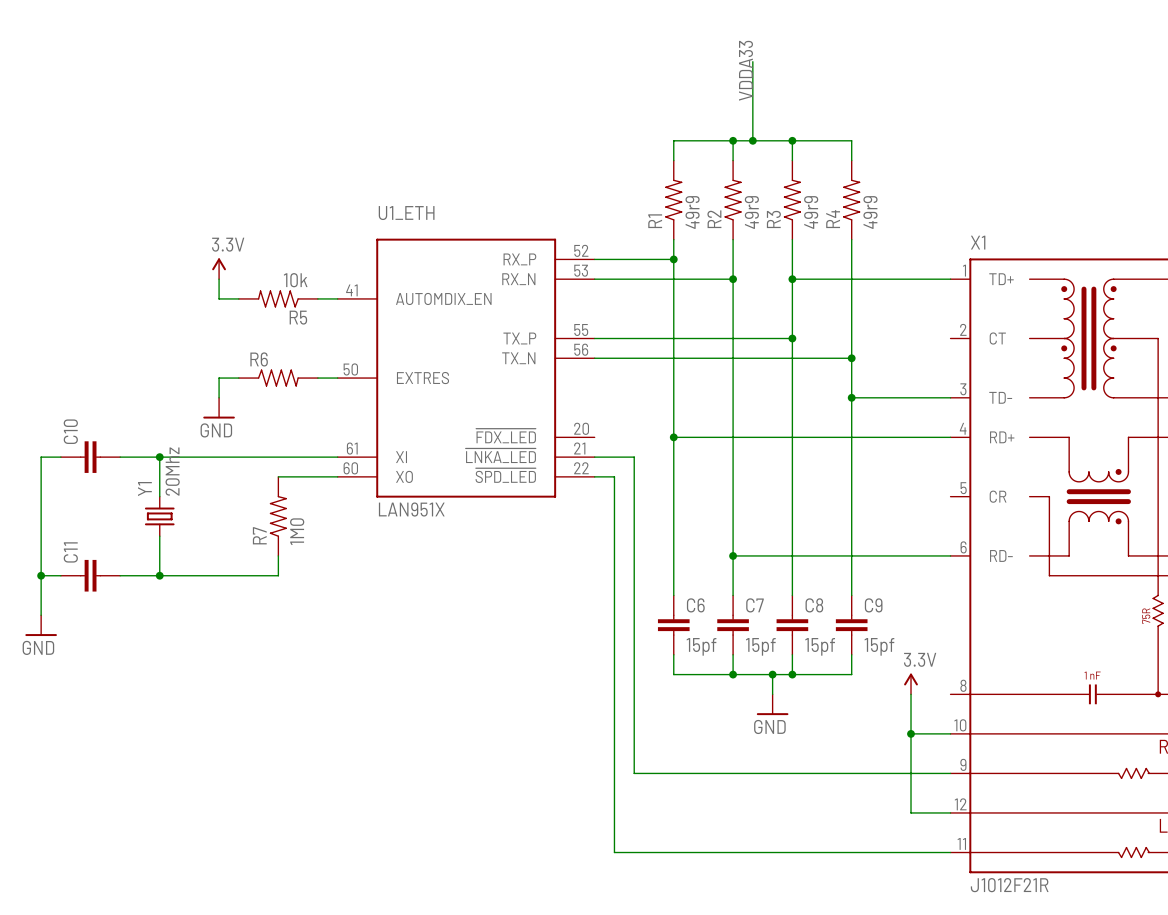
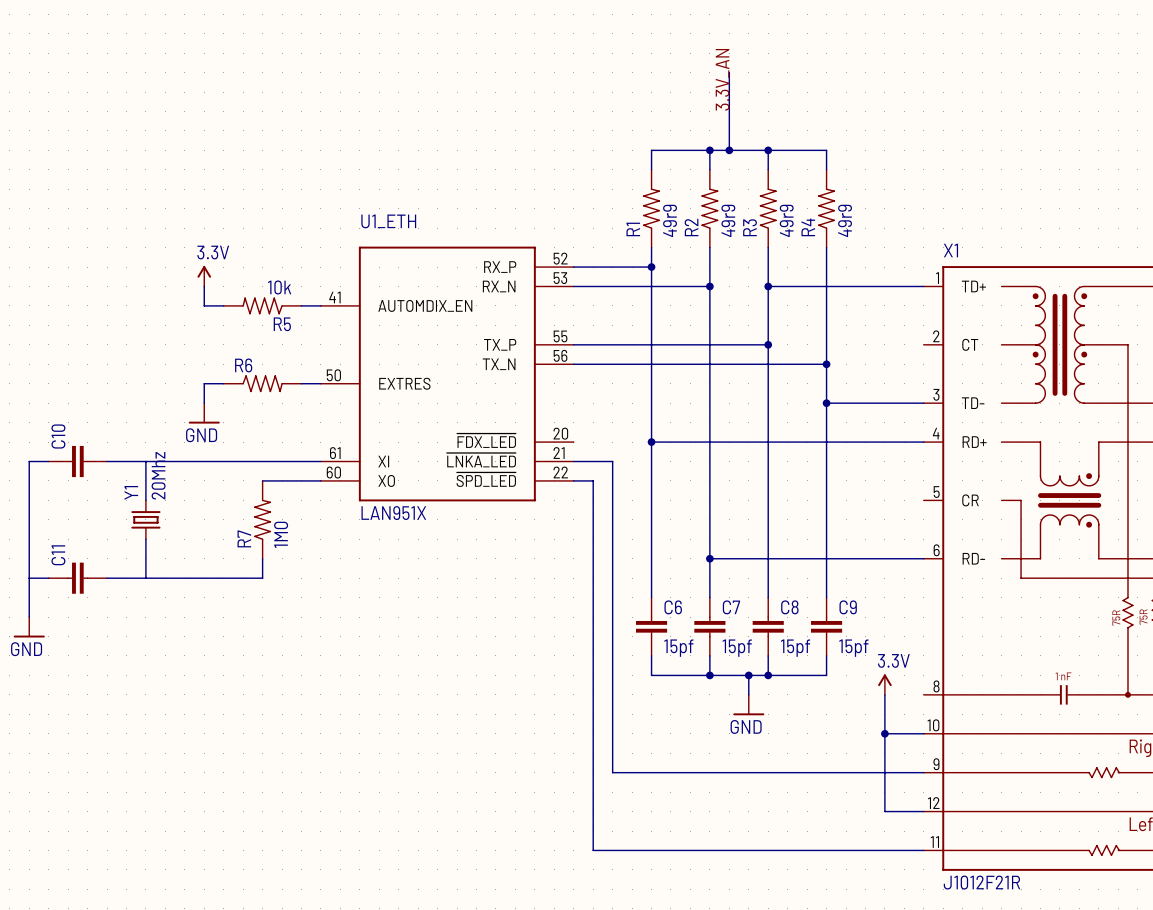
label: VDDA33 (746, 70) -> 3.3V_AN (722, 79)
junction: (159, 457) -> none
junction: (41, 575) -> none
junction: (159, 575) -> none

